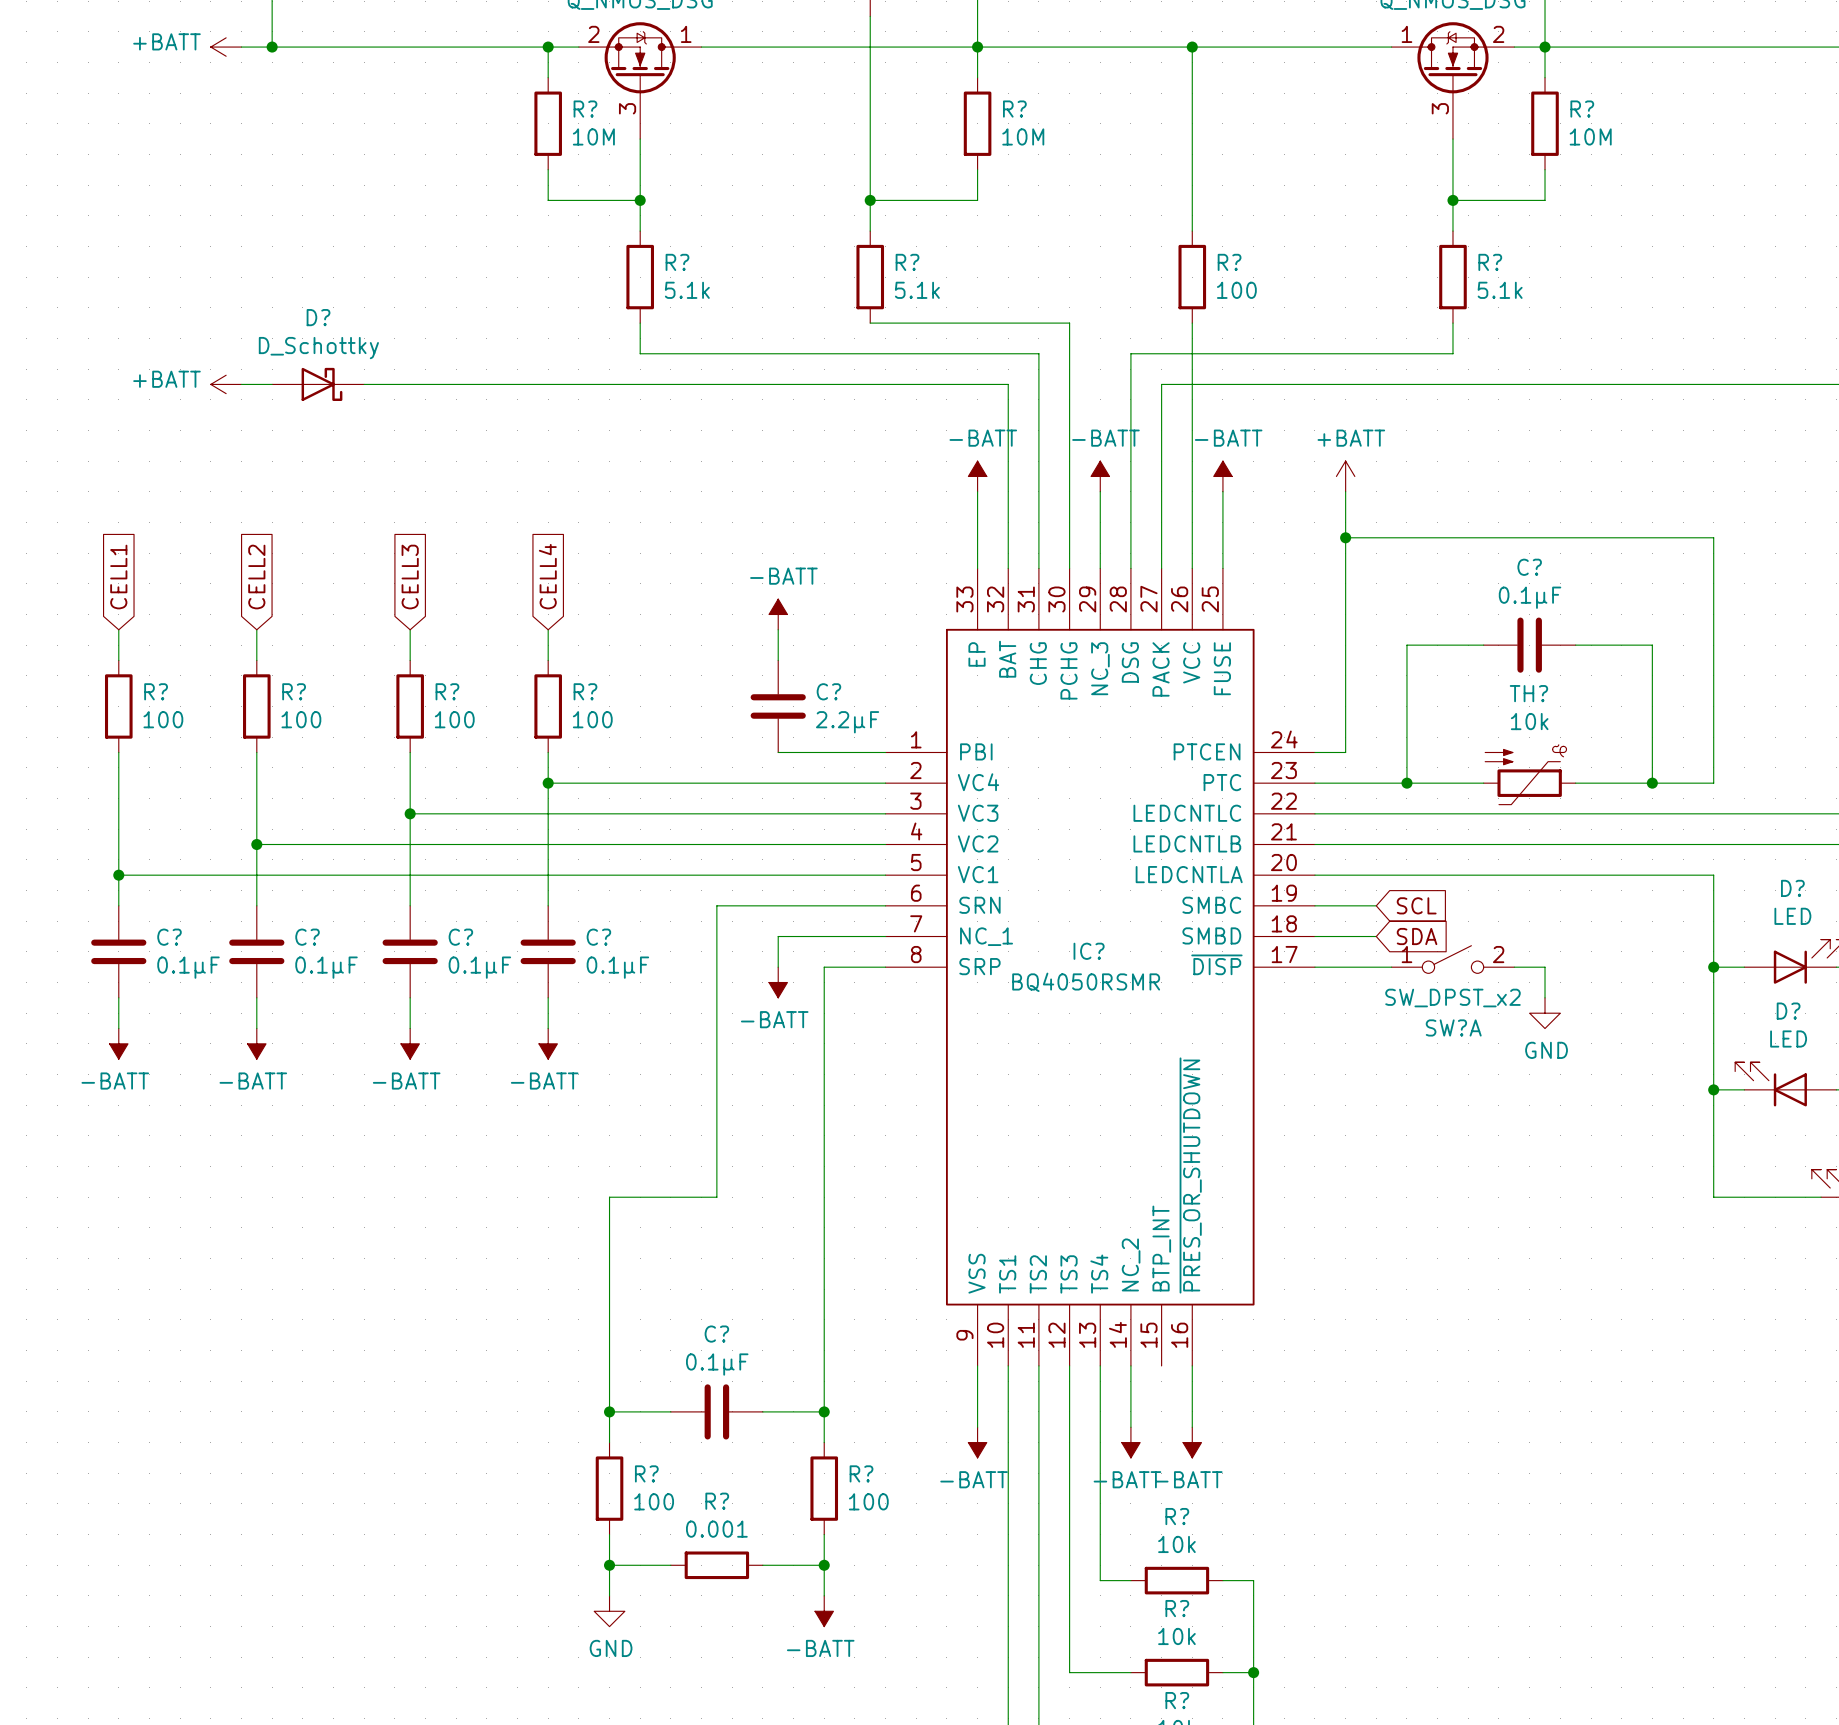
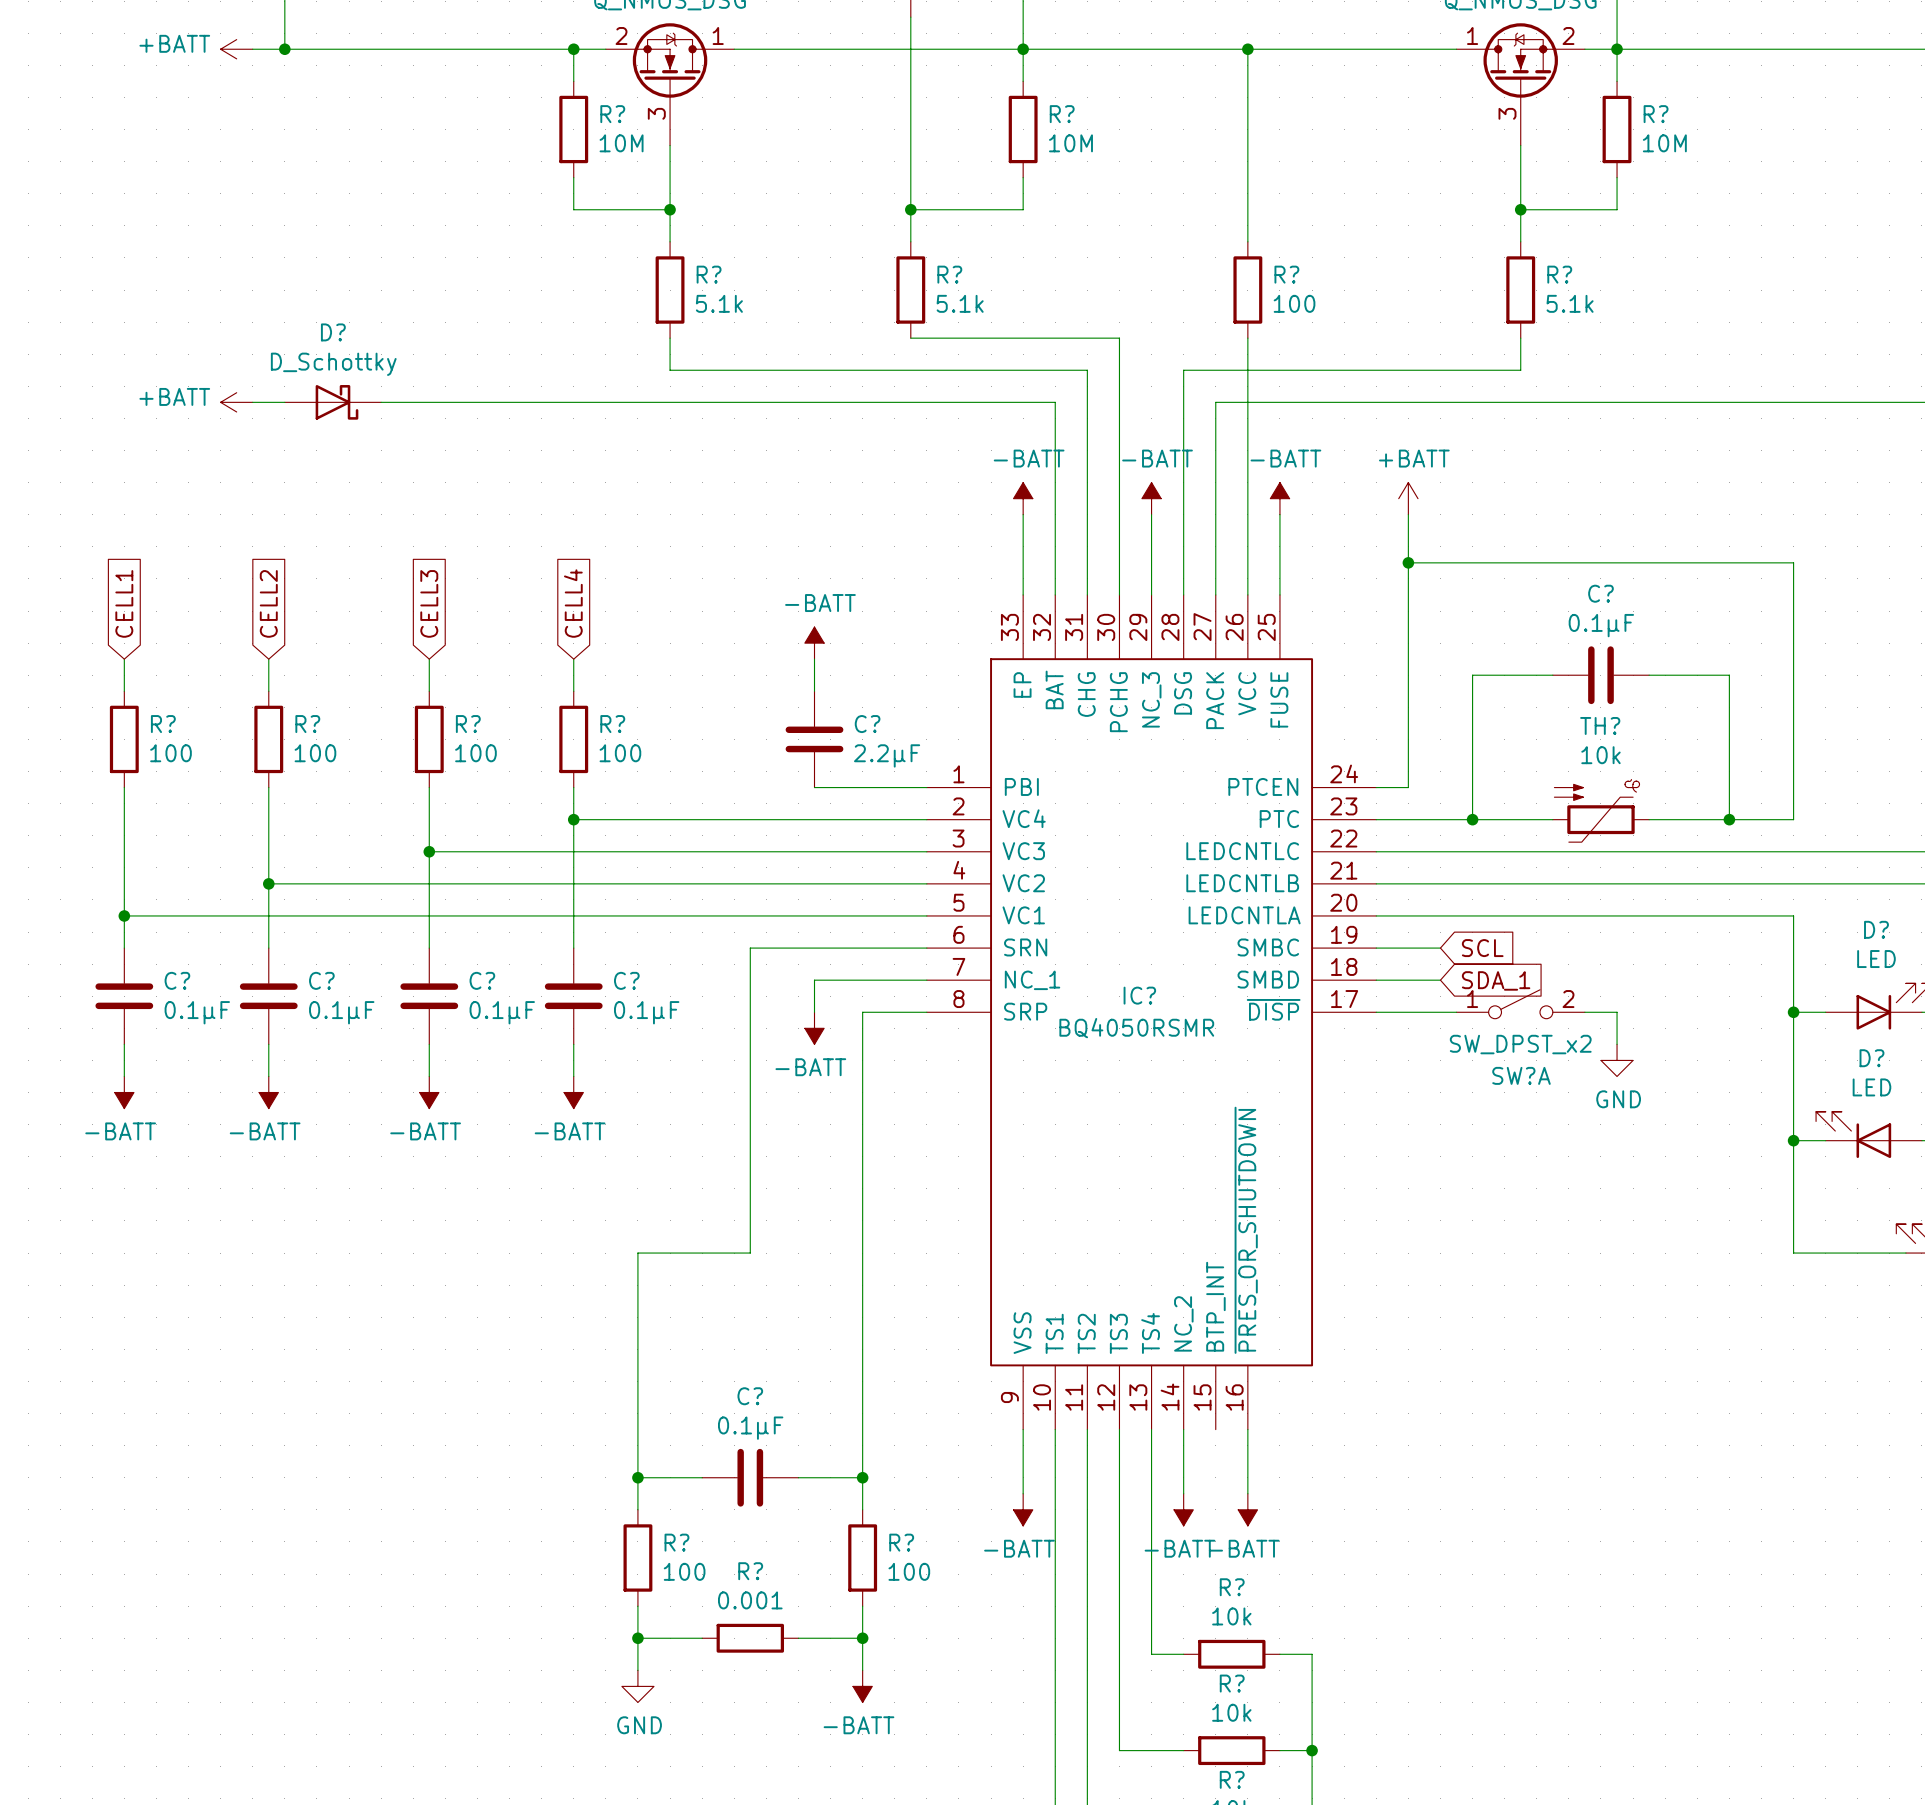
global label: SDA (1417, 936) -> SDA_1 (1496, 980)

